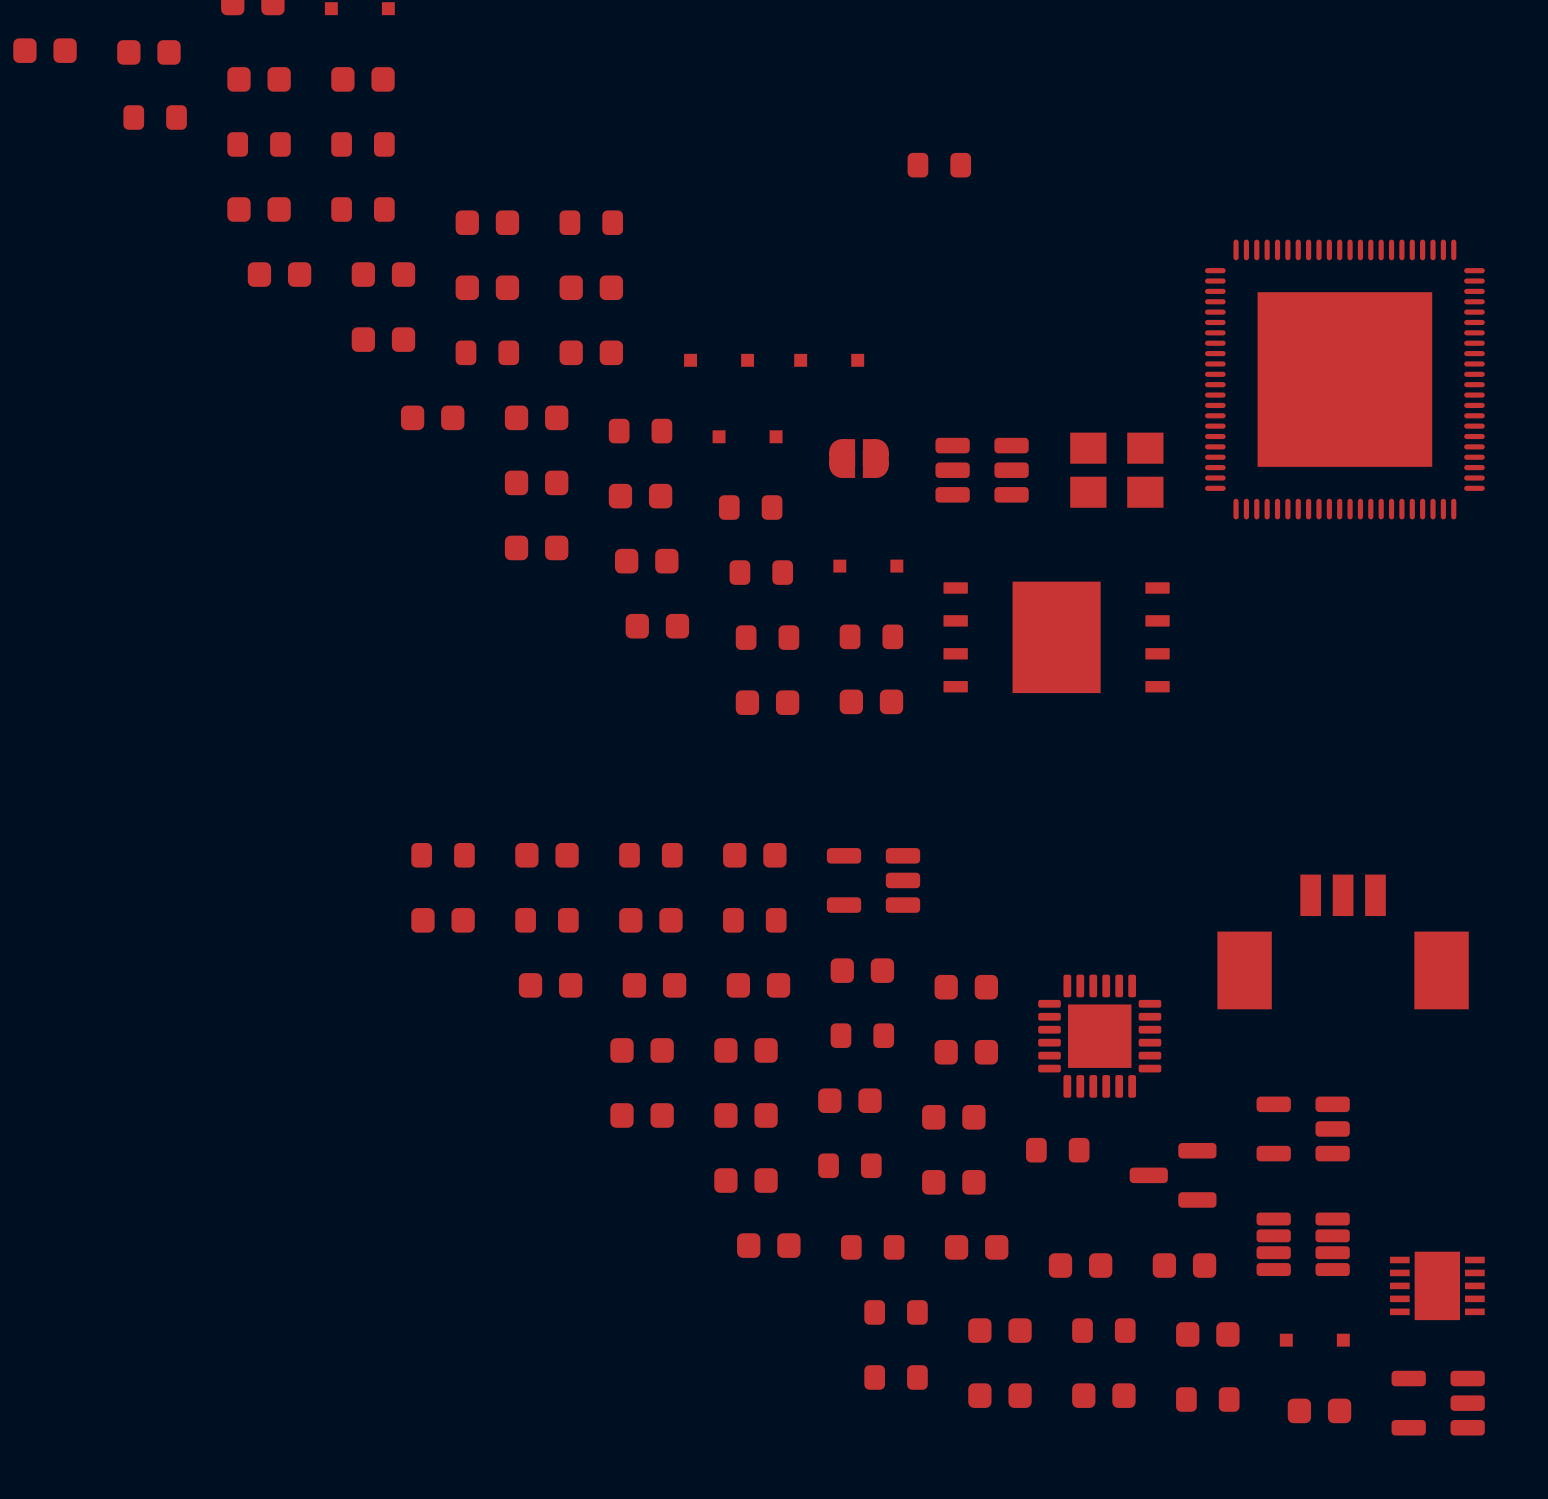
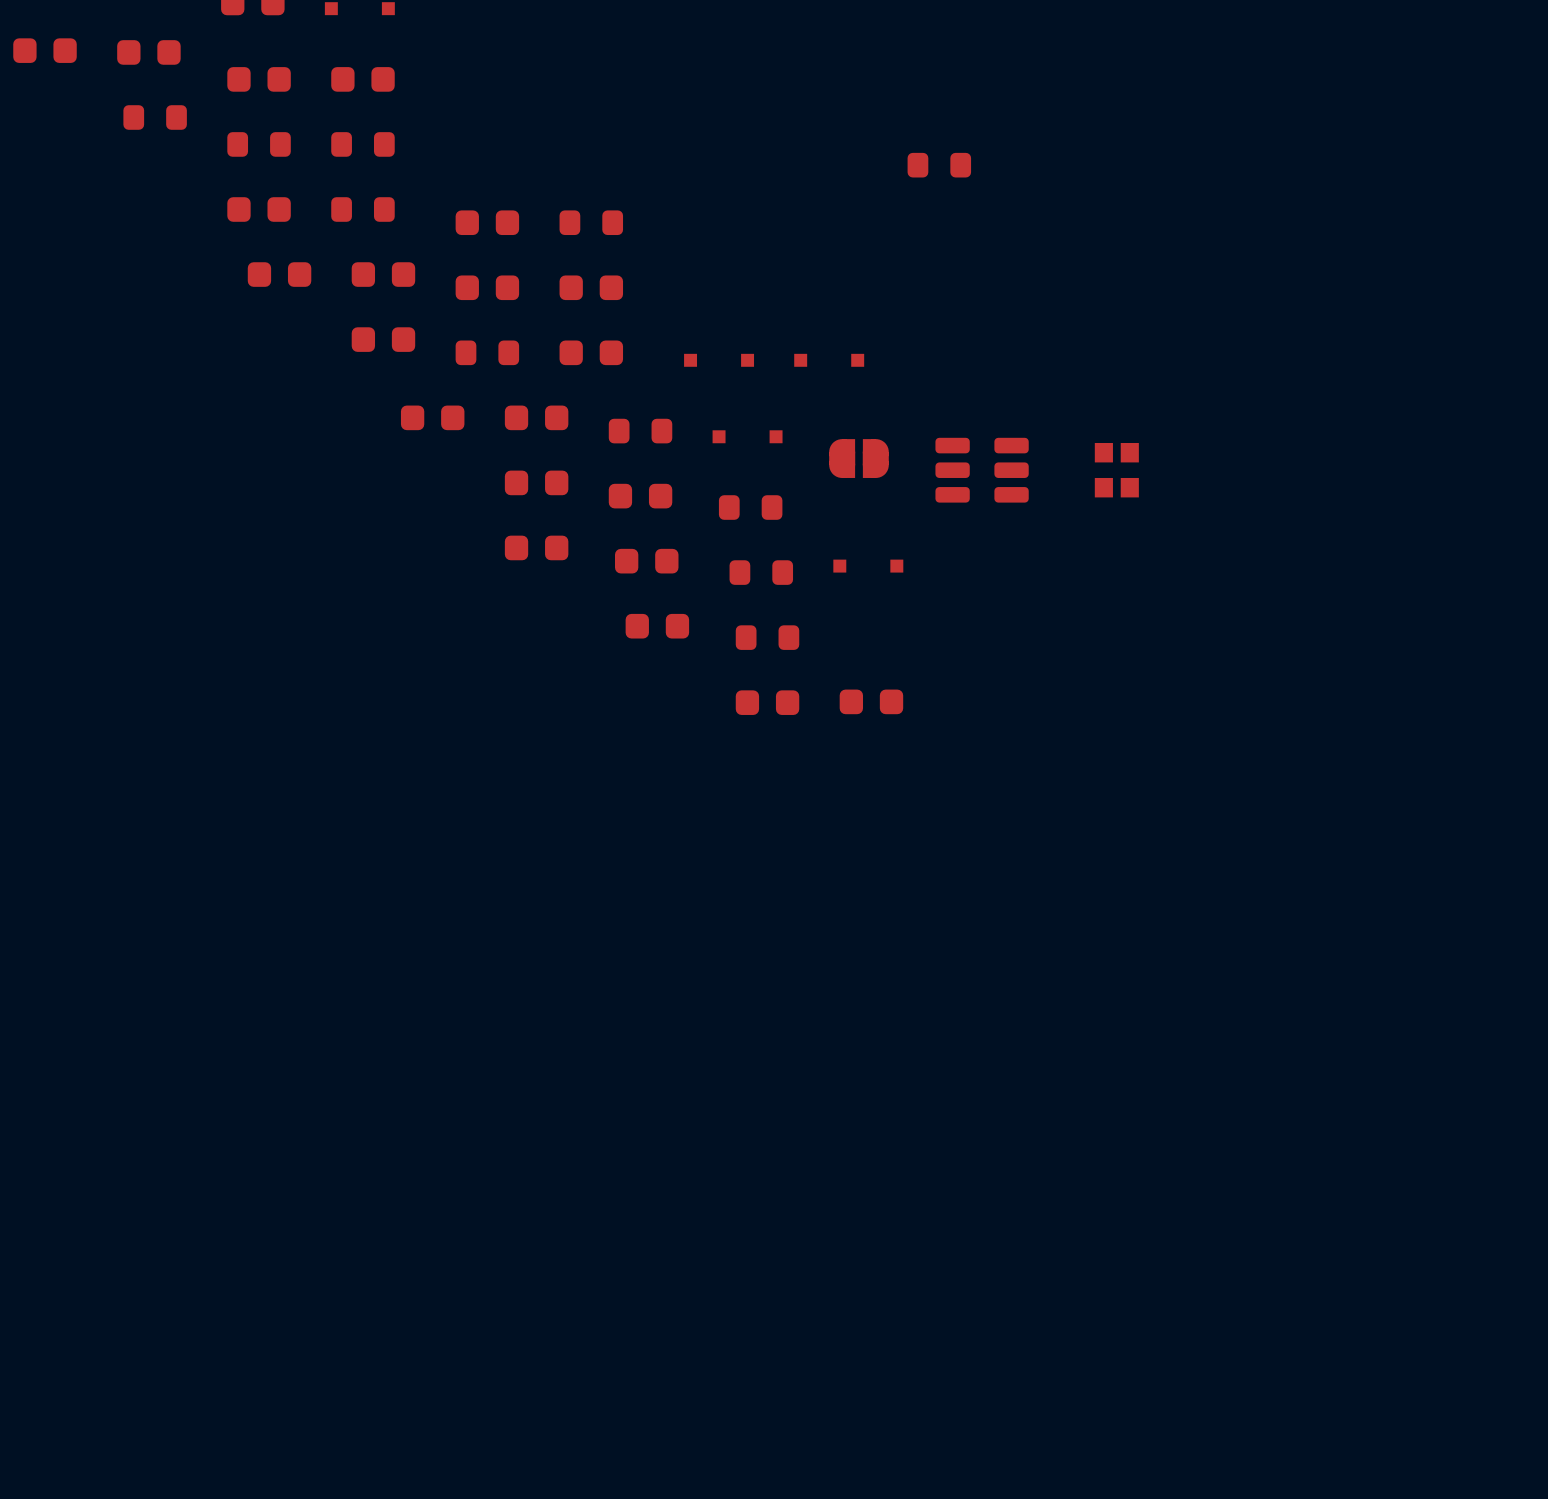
part: (1344, 379) -> none
part footprint: [1070, 432, 1164, 508] -> [1094, 442, 1139, 498]
part: (871, 636) -> none
part: (1056, 637) -> none
part: (443, 855) -> none
part: (546, 855) -> none
part: (650, 855) -> none
part: (754, 855) -> none
part: (873, 880) -> none
part: (443, 920) -> none
part: (546, 920) -> none
part: (650, 920) -> none
part: (754, 920) -> none
part: (1343, 941) -> none
part: (862, 970) -> none
part: (550, 985) -> none
part: (654, 985) -> none
part: (758, 985) -> none
part: (966, 987) -> none
part: (862, 1035) -> none
part: (1099, 1036) -> none
part: (642, 1050) -> none
part: (746, 1050) -> none
part: (966, 1052) -> none
part: (849, 1100) -> none
part: (642, 1115) -> none
part: (746, 1115) -> none
part: (953, 1117) -> none
part: (1303, 1128) -> none
part: (1057, 1150) -> none
part: (849, 1165) -> none
part: (1173, 1175) -> none
part: (746, 1180) -> none
part: (953, 1182) -> none
part: (1303, 1244) -> none
part: (768, 1245) -> none
part: (872, 1247) -> none
part: (976, 1247) -> none
part: (1080, 1265) -> none
part: (1184, 1265) -> none
part: (1437, 1285) -> none
part: (896, 1312) -> none
part: (999, 1330) -> none
part: (1103, 1330) -> none
part: (1207, 1334) -> none
part: (1314, 1340) -> none
part: (896, 1377) -> none
part: (999, 1395) -> none
part: (1103, 1395) -> none
part: (1207, 1399) -> none
part: (1438, 1403) -> none
part: (1319, 1410) -> none

